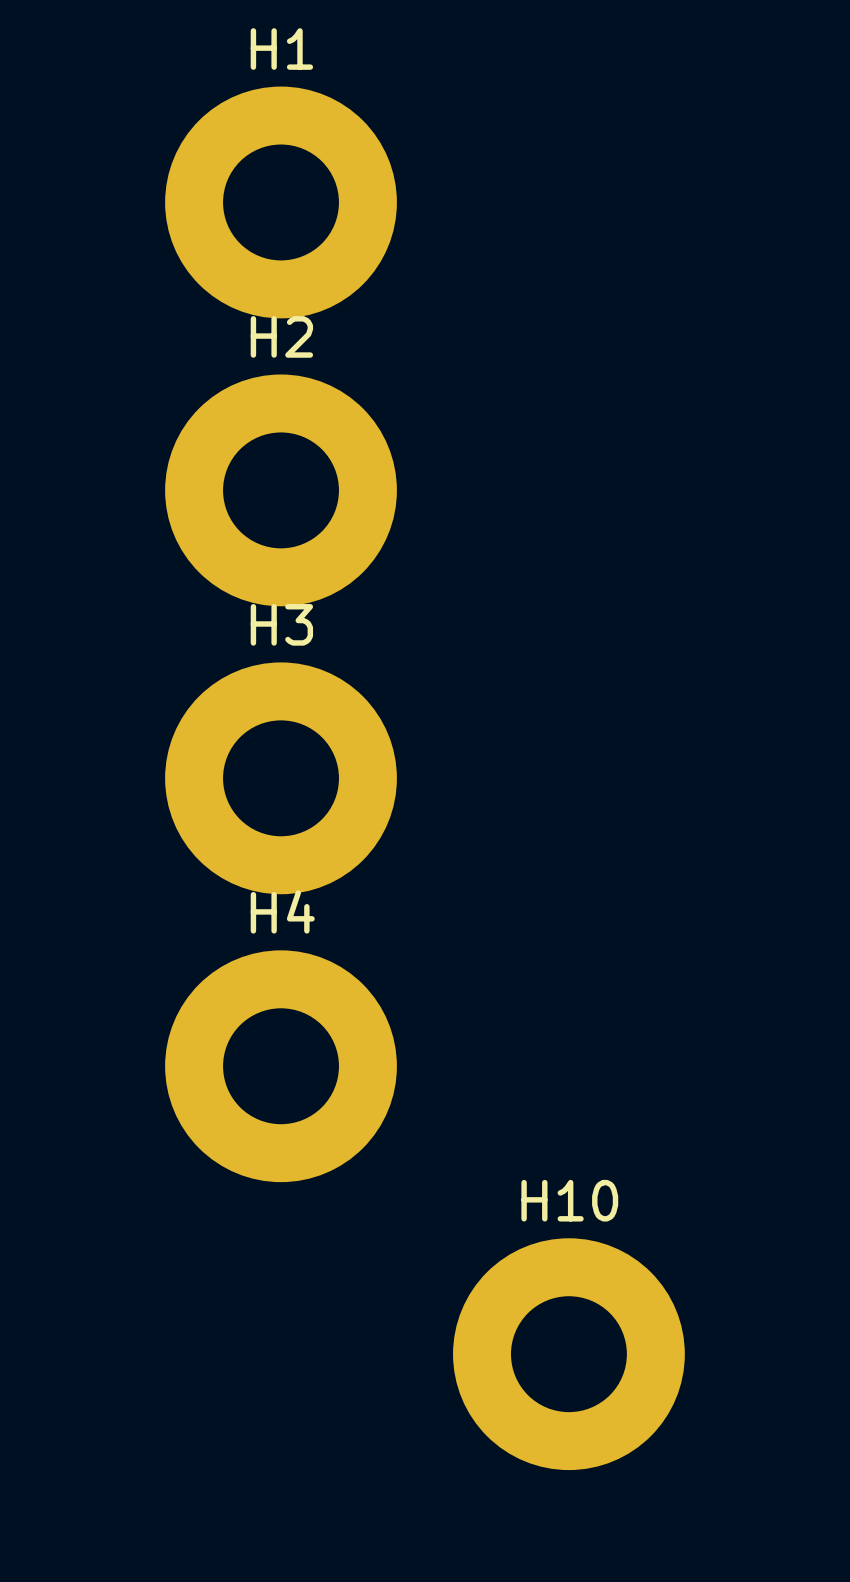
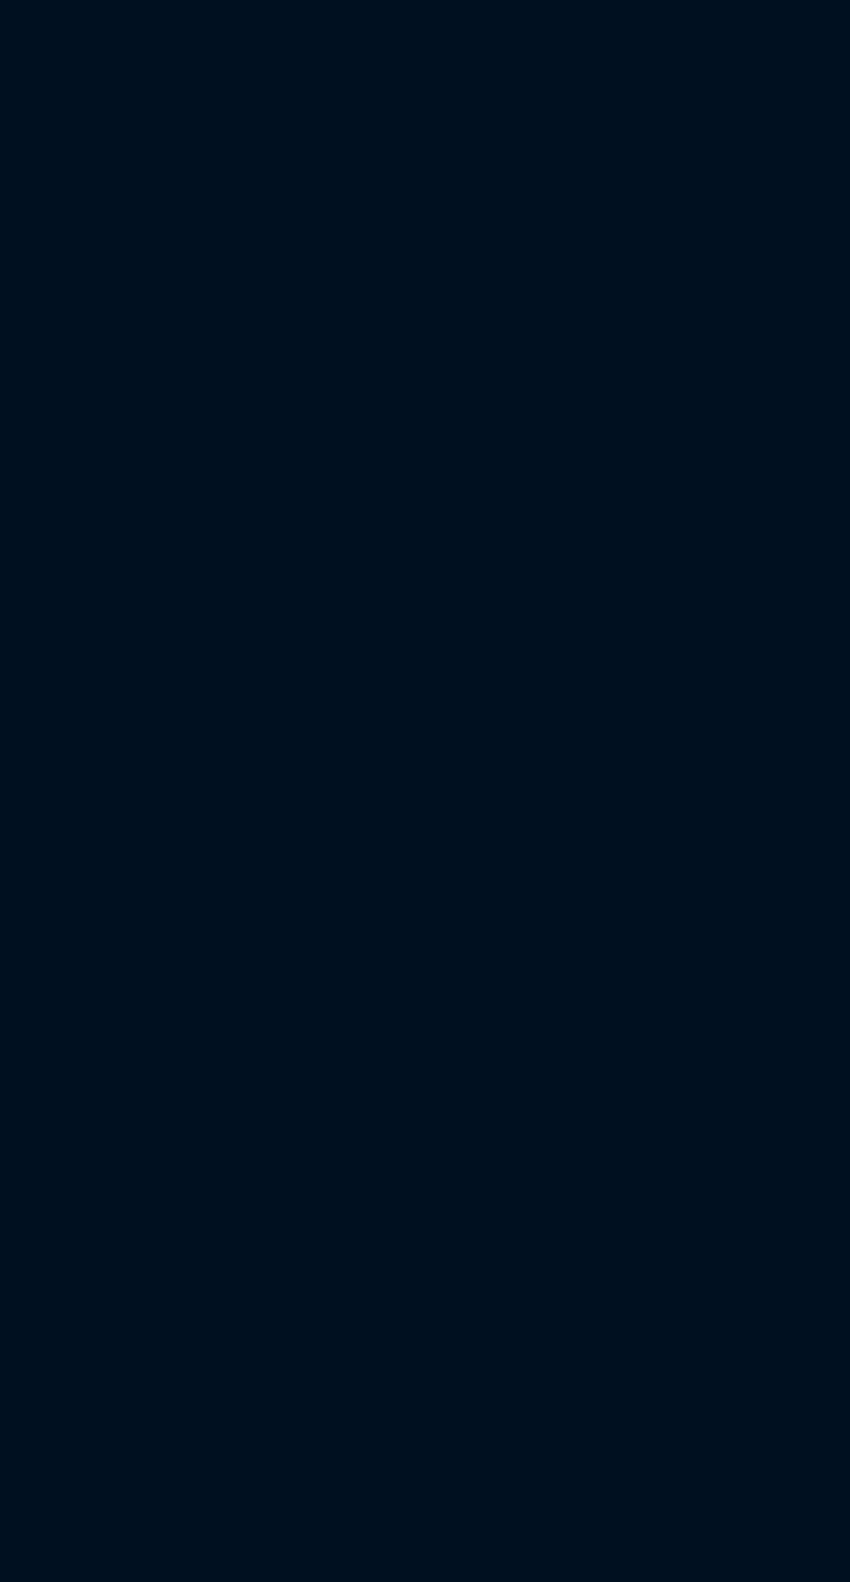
H1: (281, 202) -> none
H2: (281, 490) -> none
H3: (281, 778) -> none
H4: (281, 1066) -> none
H10: (568, 1354) -> none

